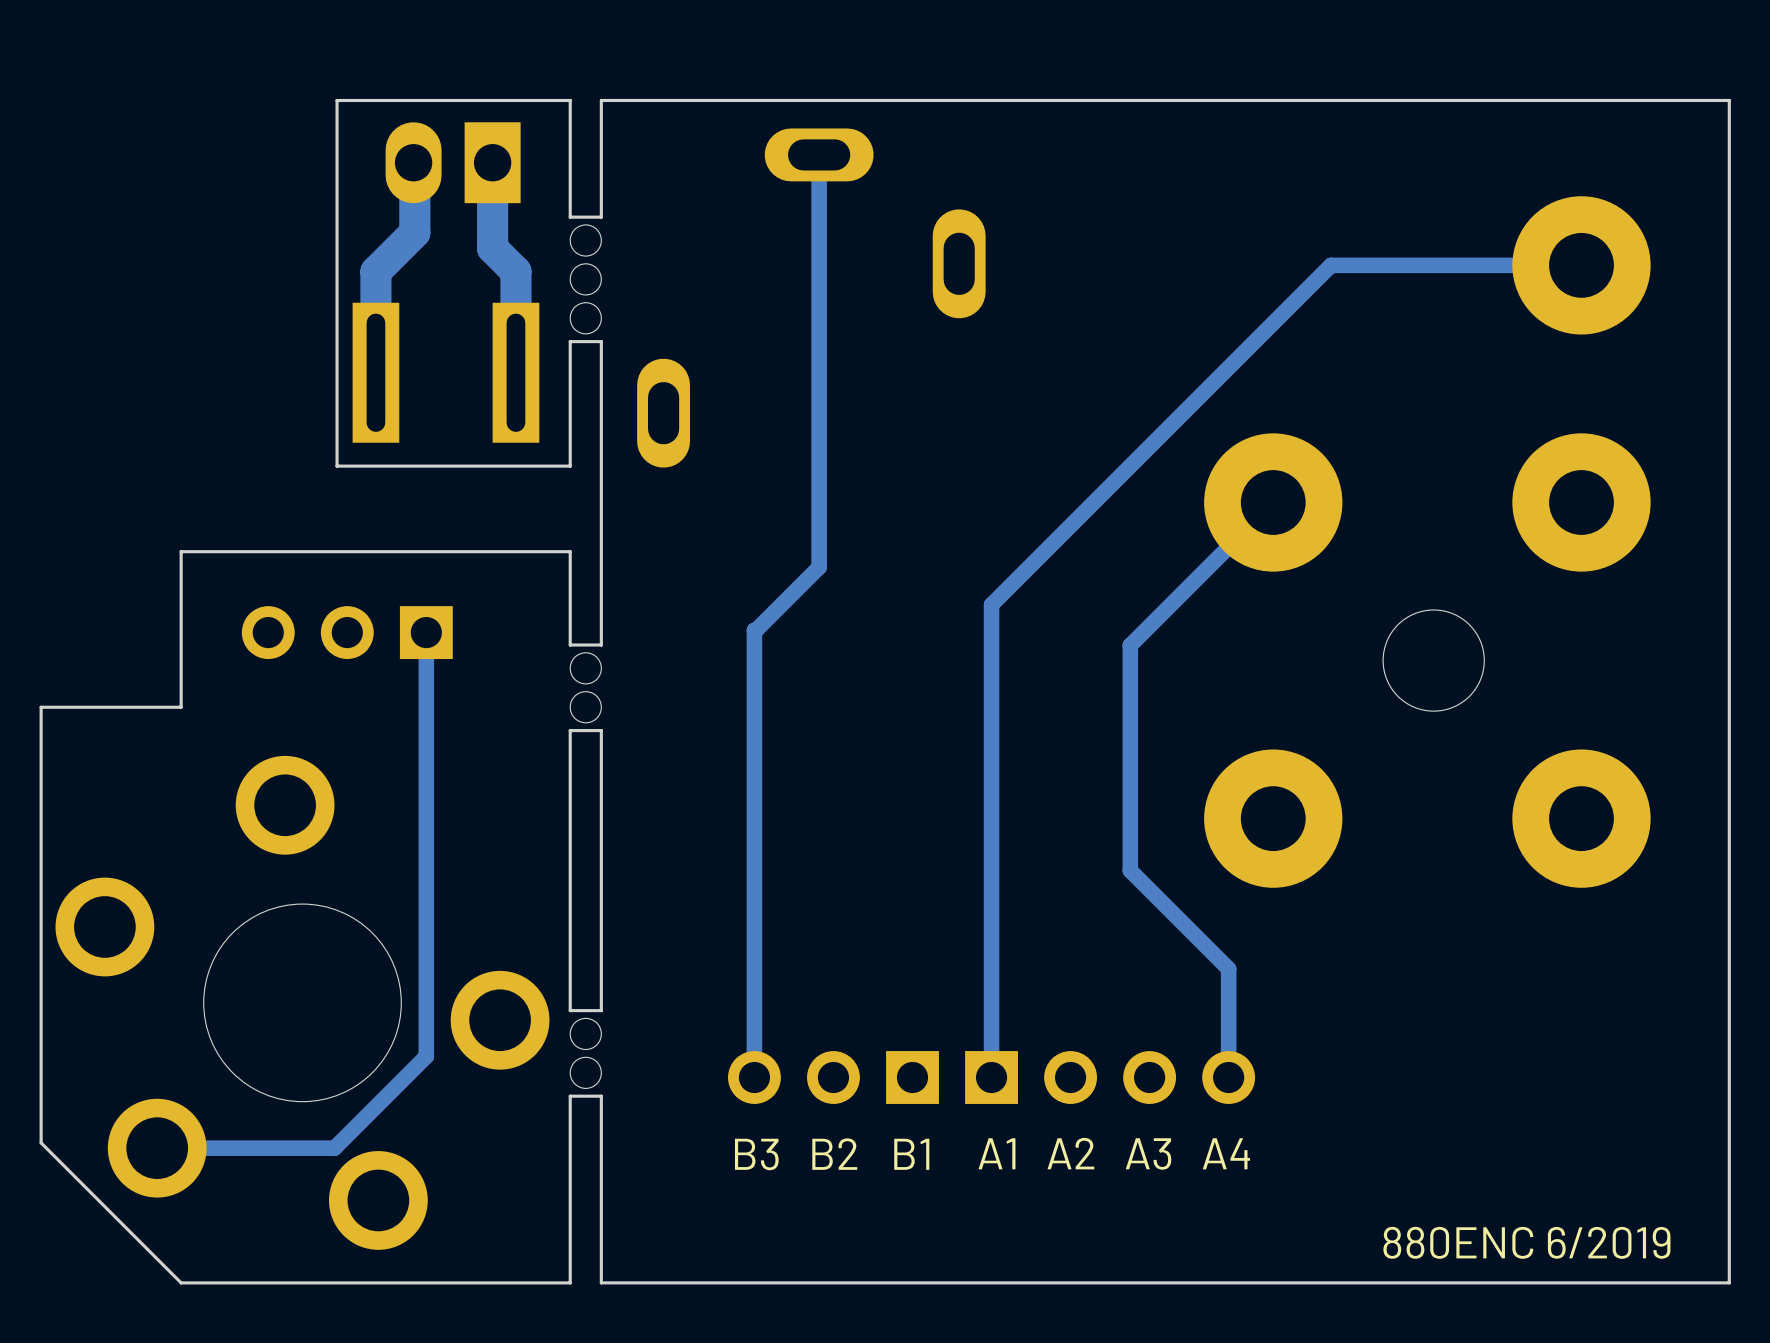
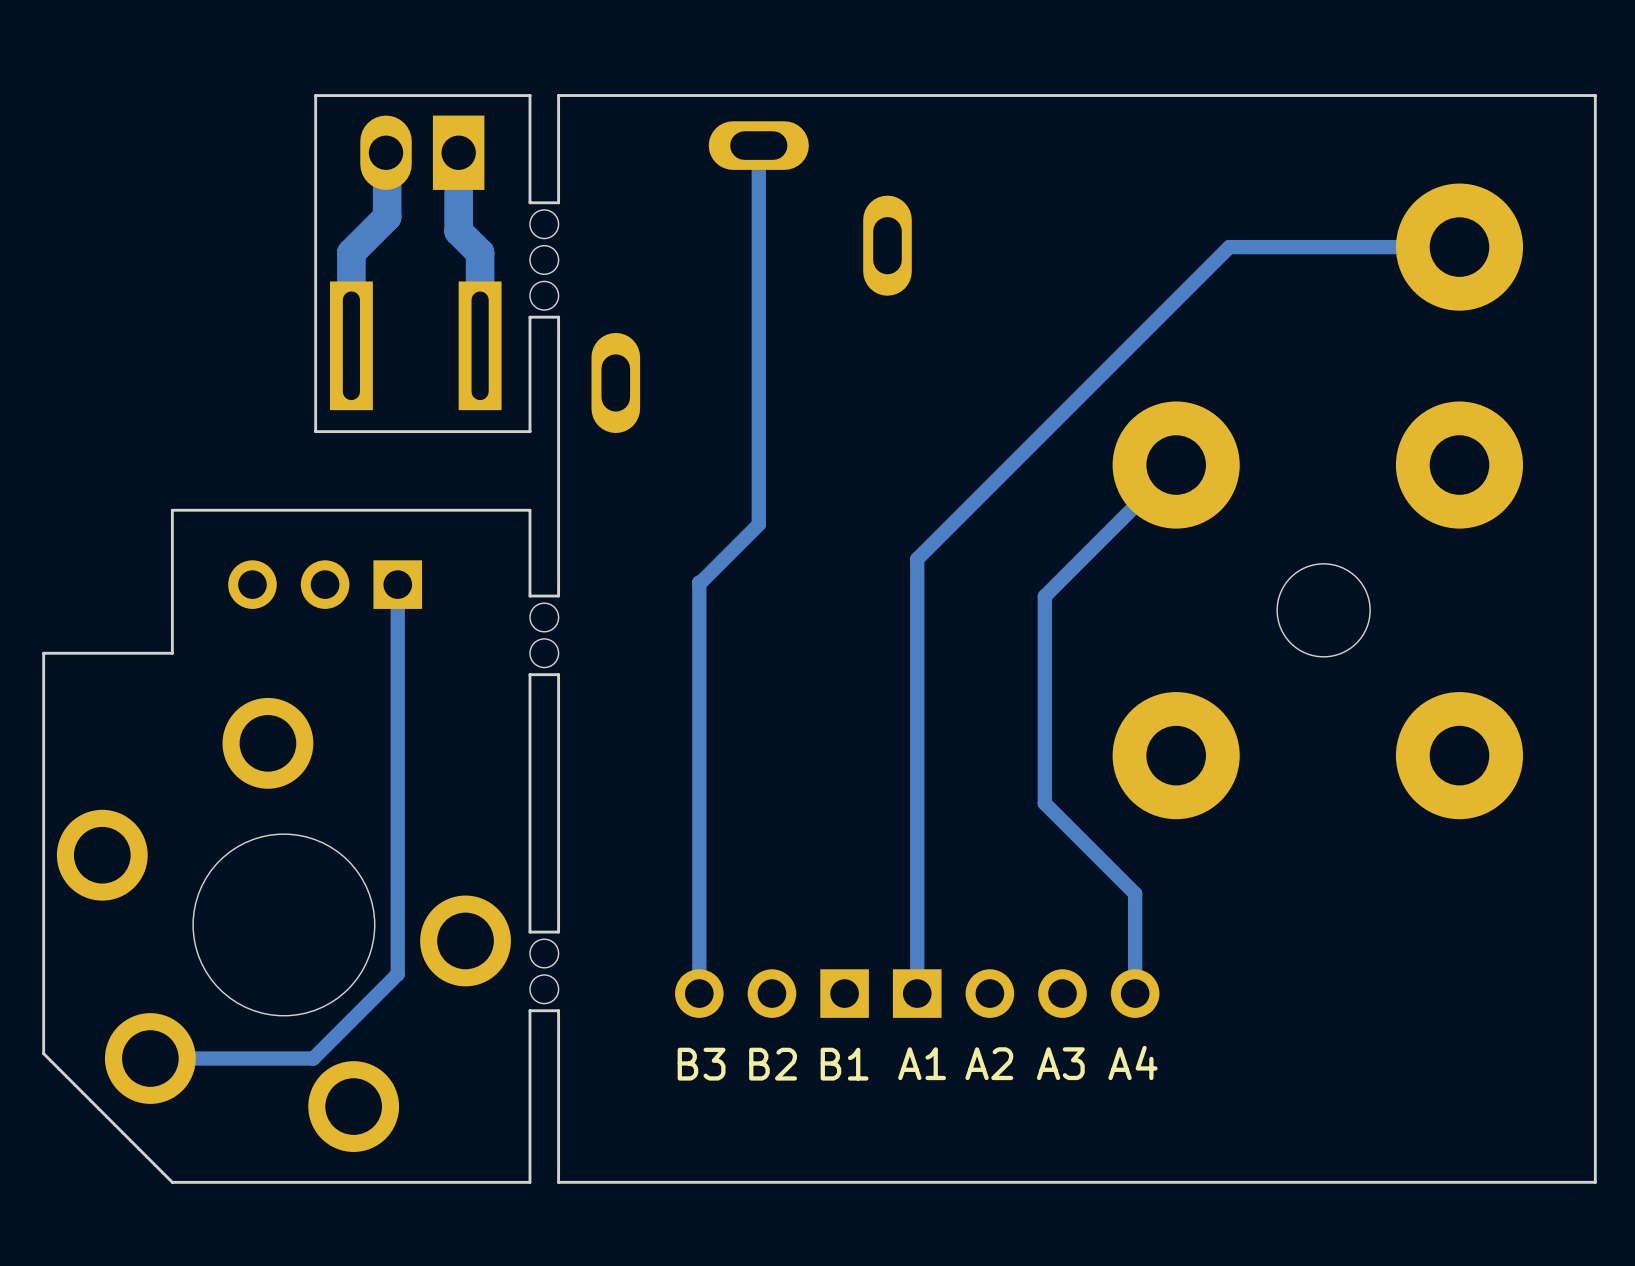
text: 880ENC 6/2019 (1526, 1242) -> none

